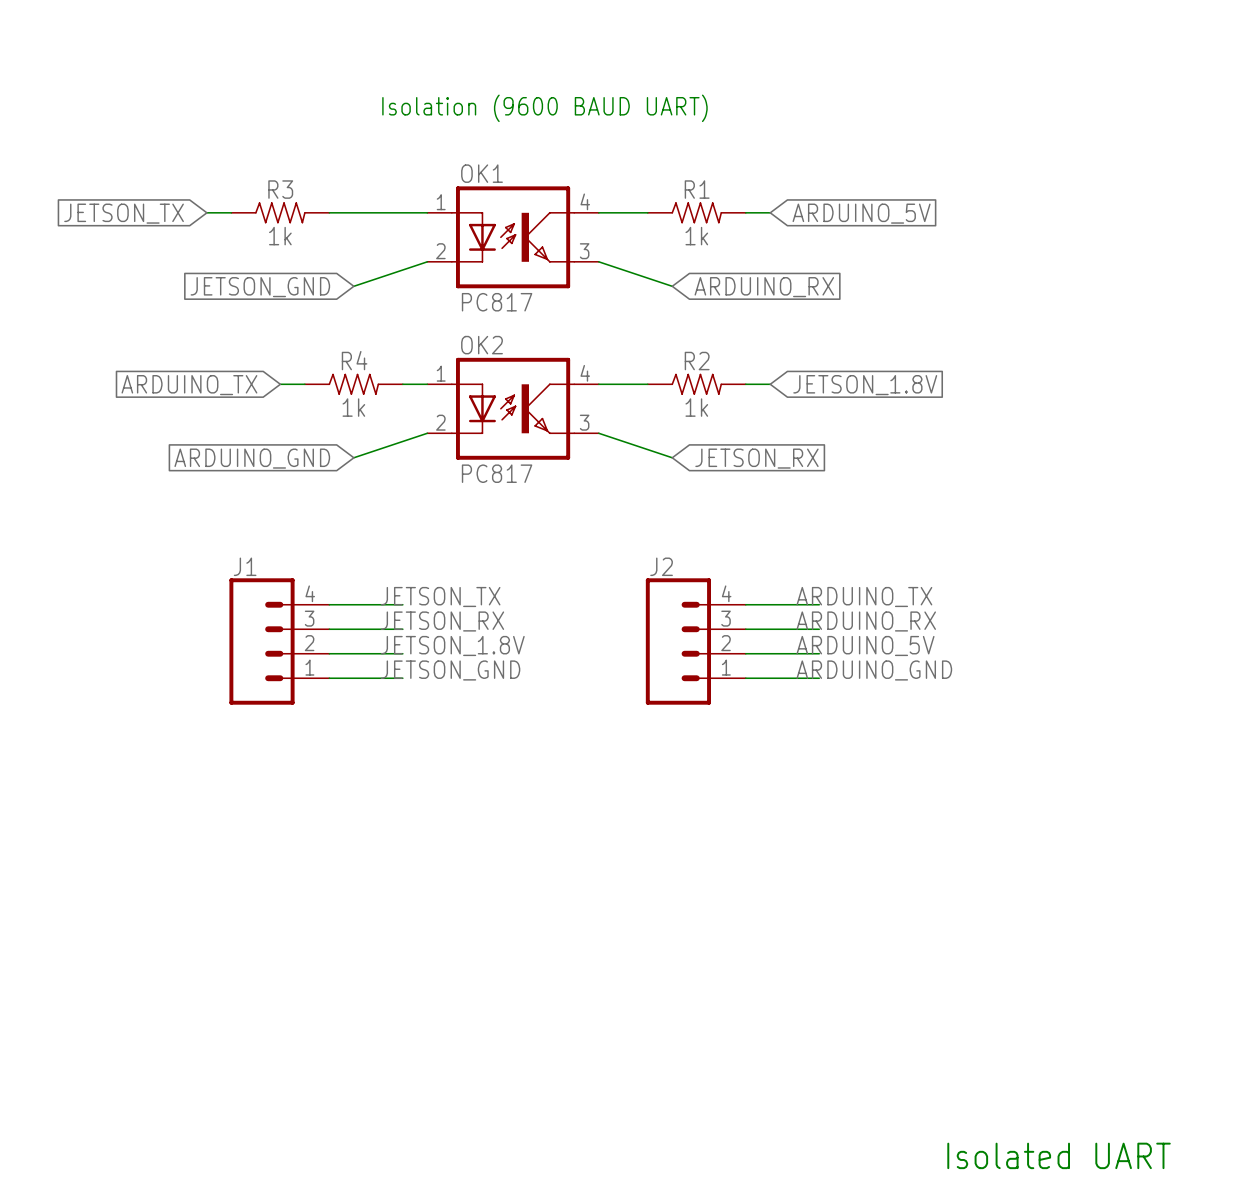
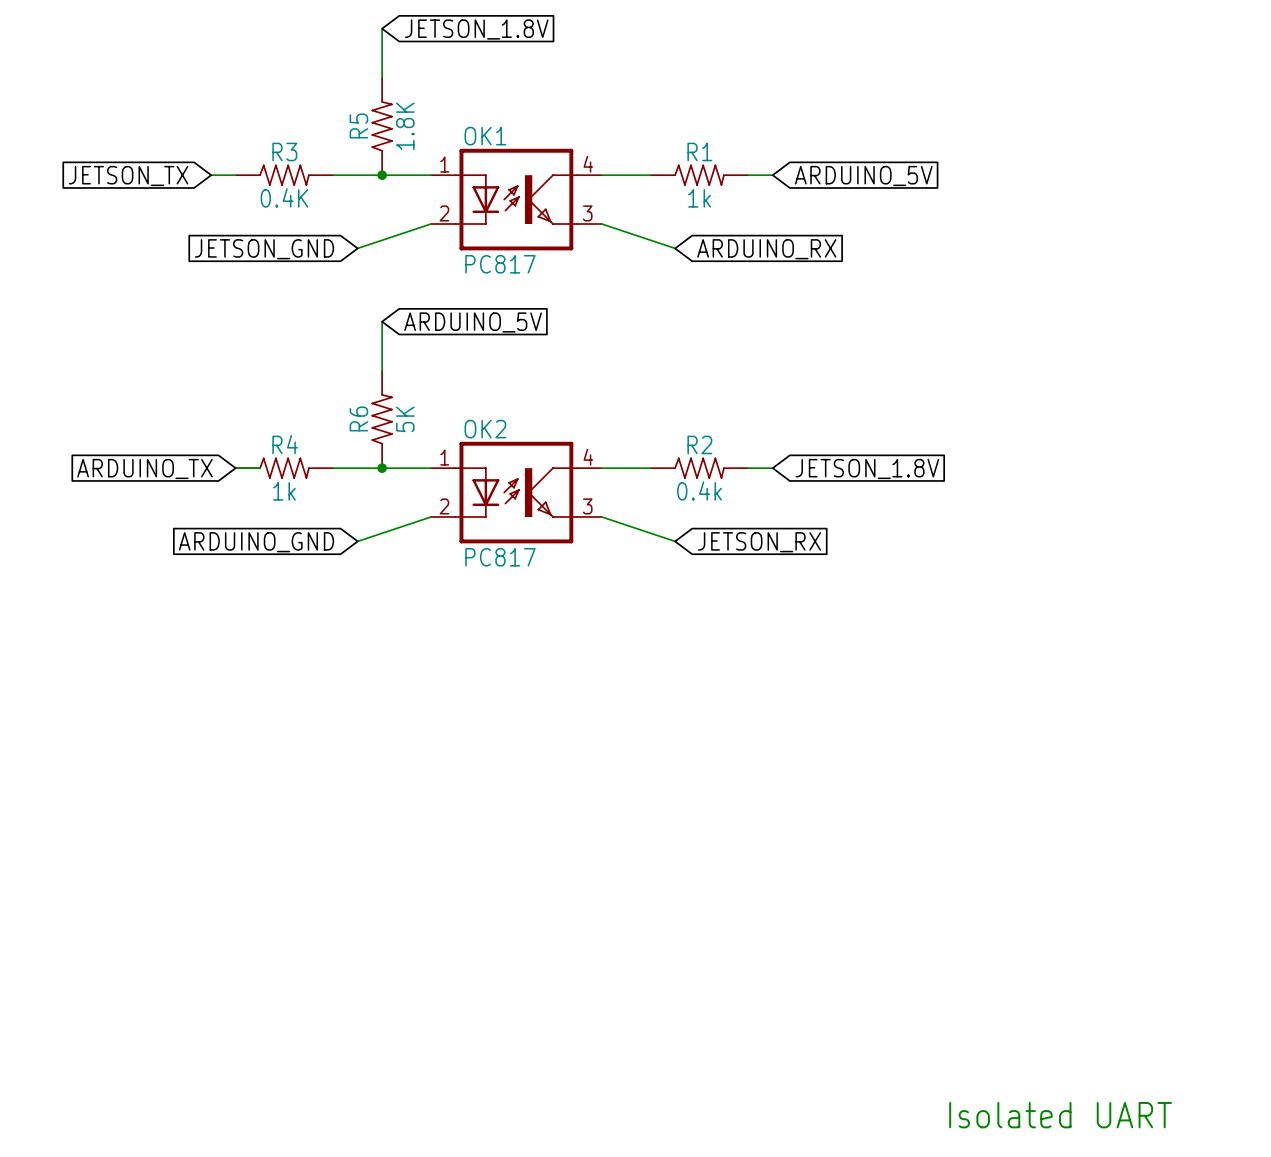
wire: none -> (382, 28) (382, 77)
global label: none -> JETSON_1.8V (476, 29)
text: Isolation (9600 BAUD UART) (544, 108) -> none
R5: none -> 1.8K (382, 126)
junction: none -> (382, 175)
R3 value: 1k (280, 236) -> 0.4K (284, 197)
wire: none -> (382, 321) (382, 370)
global label: none -> ARDUINO_5V (473, 322)
wire: (280, 384) (304, 384) -> (235, 468) (260, 468)
R4 position: (353, 384) -> (284, 468)
wire: (402, 384) (427, 384) -> none
wire: (598, 384) (647, 384) -> (601, 468) (650, 468)
R2 position: (696, 384) -> (699, 468)
wire: (745, 384) (770, 384) -> (748, 468) (772, 468)
global label position: ARDUINO_TX (189, 385) -> ARDUINO_TX (145, 468)
global label position: JETSON_1.8V (865, 385) -> JETSON_1.8V (867, 468)
R2 value: 1k (696, 407) -> 0.4k (699, 490)
OK2 position: (513, 408) -> (516, 492)
wire: (427, 433) (353, 457) -> (430, 516) (357, 541)
wire: (598, 433) (672, 457) -> (601, 516) (675, 541)
R6: none -> 5K (382, 419)
global label position: ARDUINO_GND (252, 458) -> ARDUINO_GND (256, 542)
global label position: JETSON_RX (756, 458) -> JETSON_RX (759, 542)
wire: none -> (333, 468) (430, 468)
junction: none -> (382, 468)
label: JETSON_TX (440, 596) -> none
label: ARDUINO_TX (864, 596) -> none
wire: (329, 604) (402, 604) -> none
wire: (745, 604) (819, 604) -> none
label: JETSON_RX (442, 621) -> none
label: ARDUINO_RX (866, 621) -> none
wire: (329, 629) (402, 629) -> none
wire: (745, 629) (819, 629) -> none
J1: (279, 641) -> none
J2: (695, 641) -> none
label: JETSON_1.8V (452, 645) -> none
label: ARDUINO_5V (865, 645) -> none
wire: (329, 653) (402, 653) -> none
wire: (745, 653) (819, 653) -> none
label: JETSON_GND (450, 670) -> none
label: ARDUINO_GND (874, 670) -> none
wire: (329, 678) (402, 678) -> none
wire: (745, 678) (819, 678) -> none

